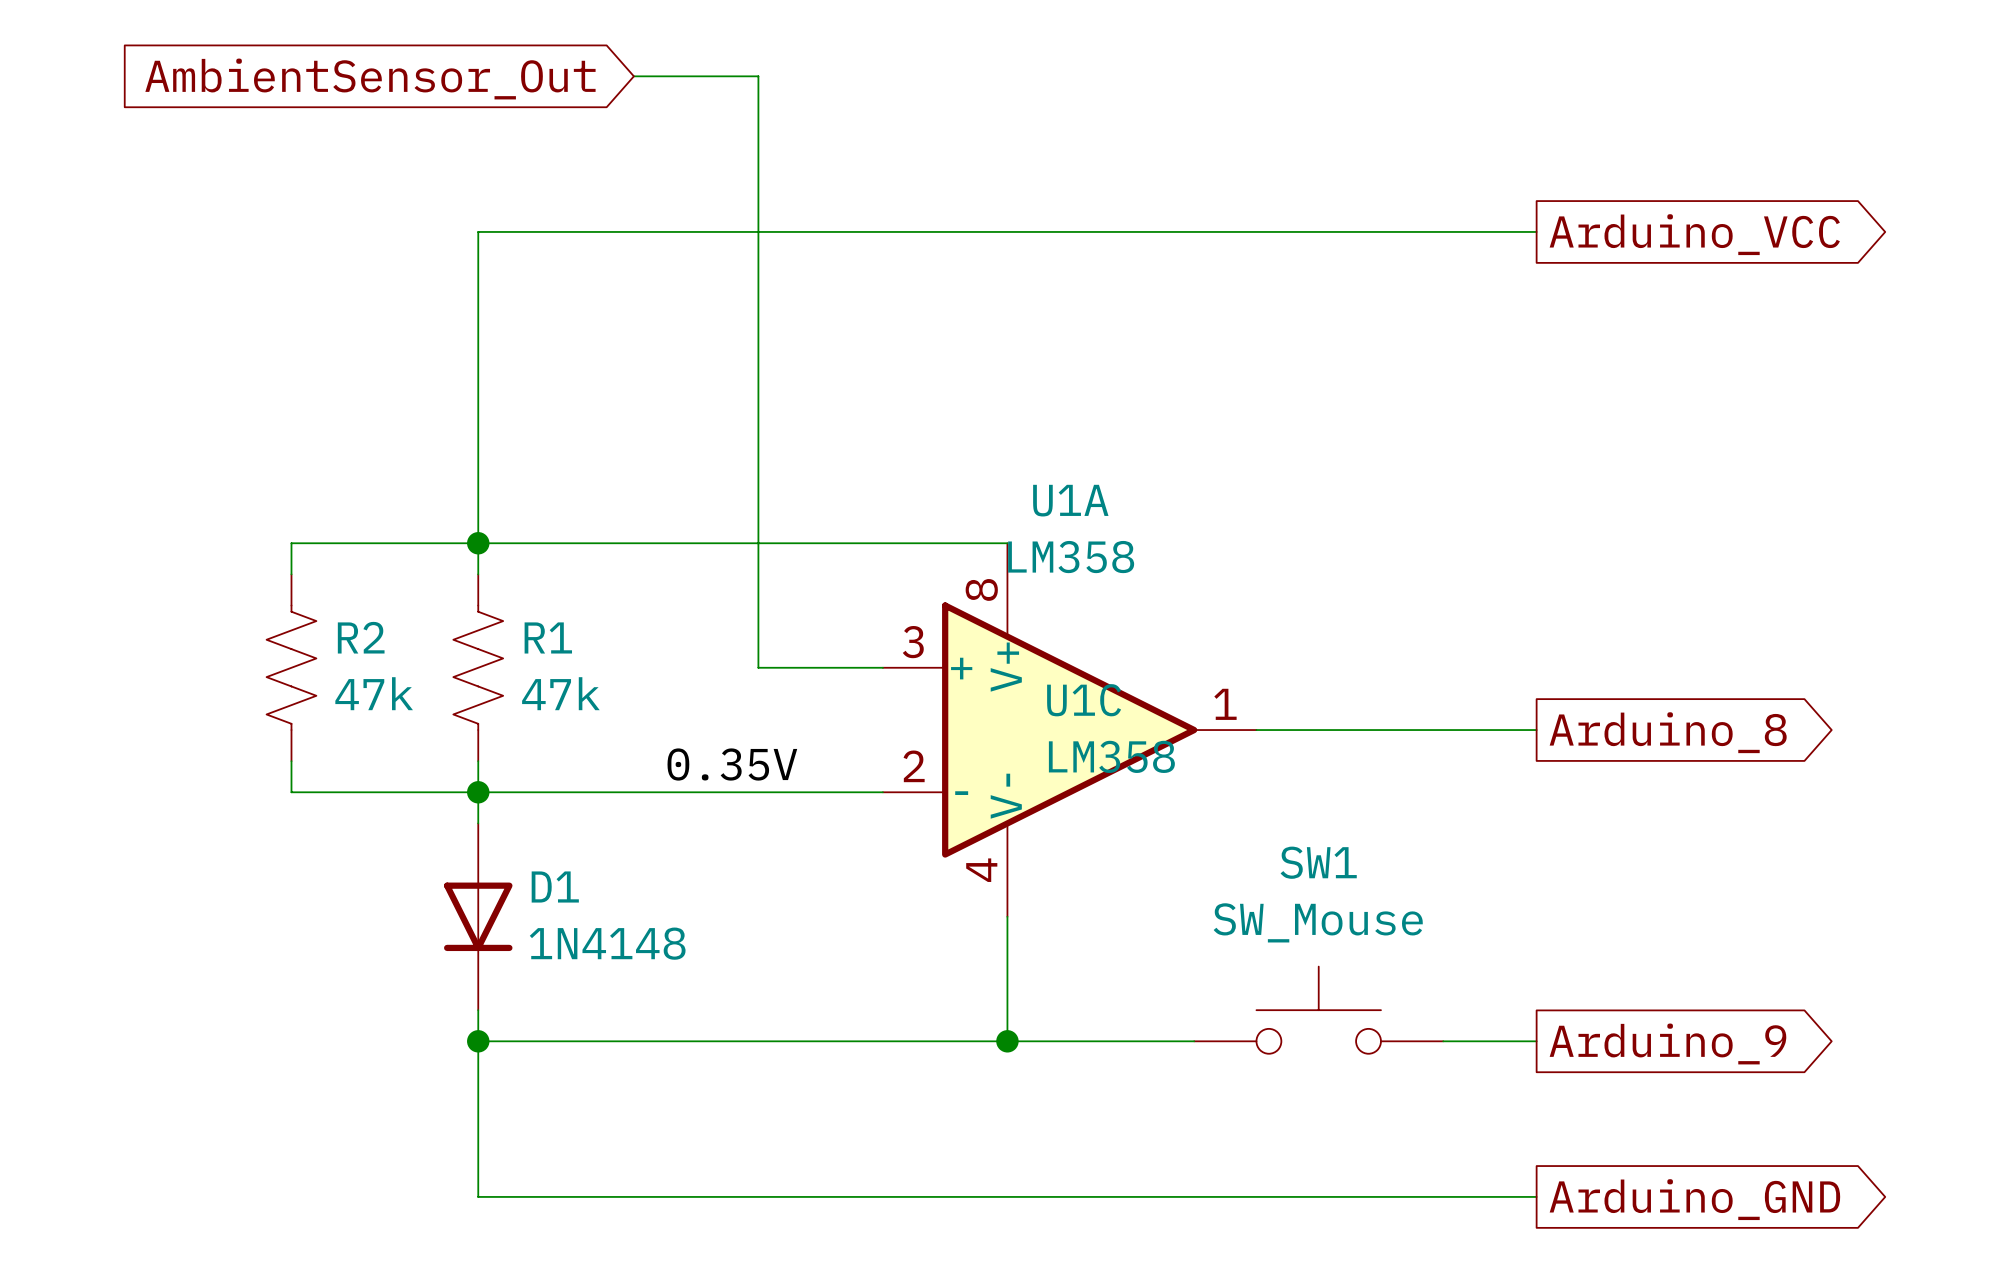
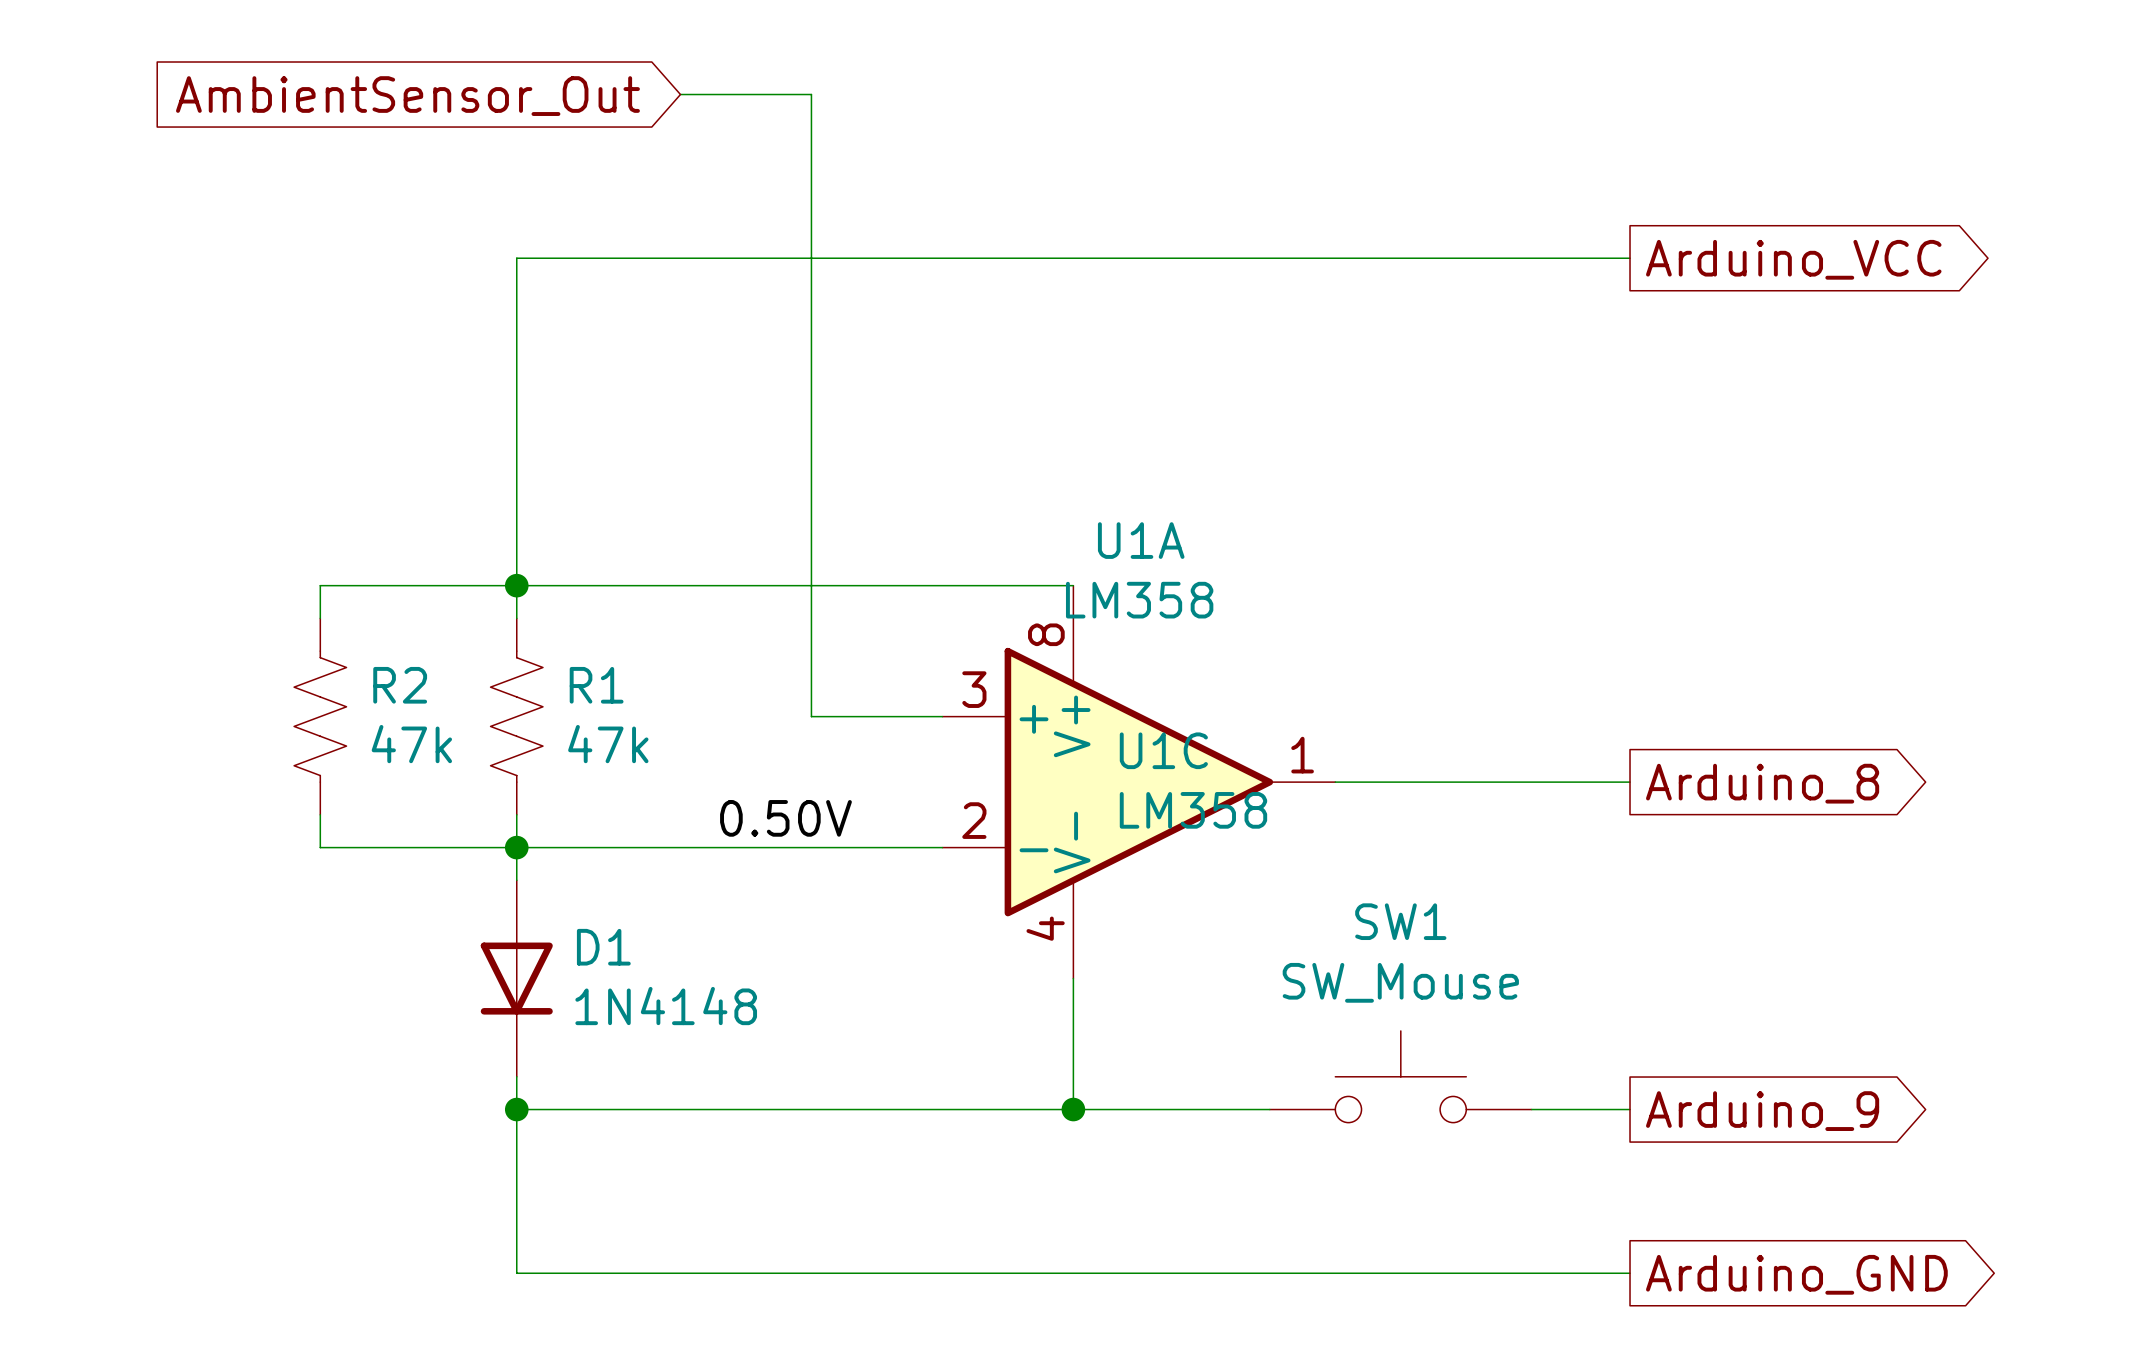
label: 0.35V (732, 764) -> 0.50V (785, 818)

